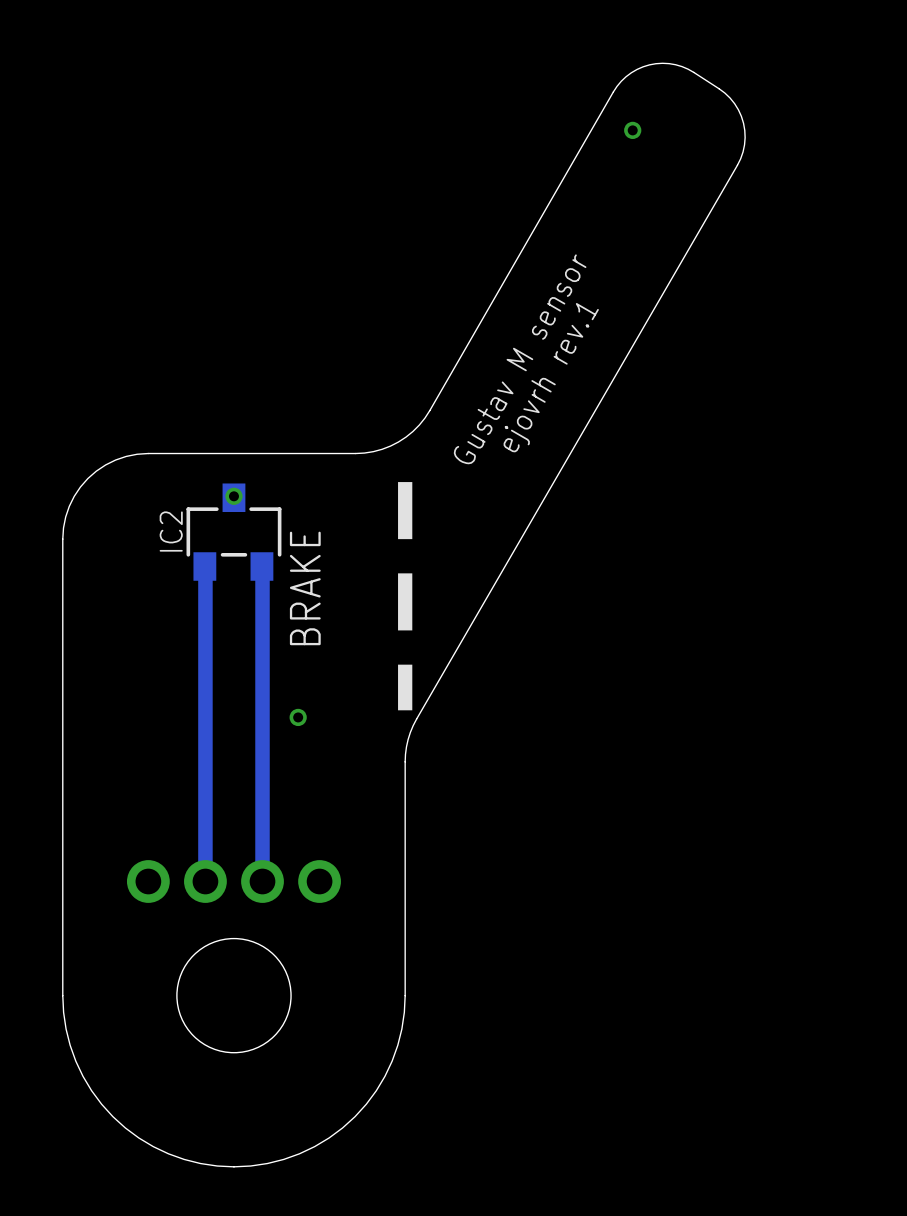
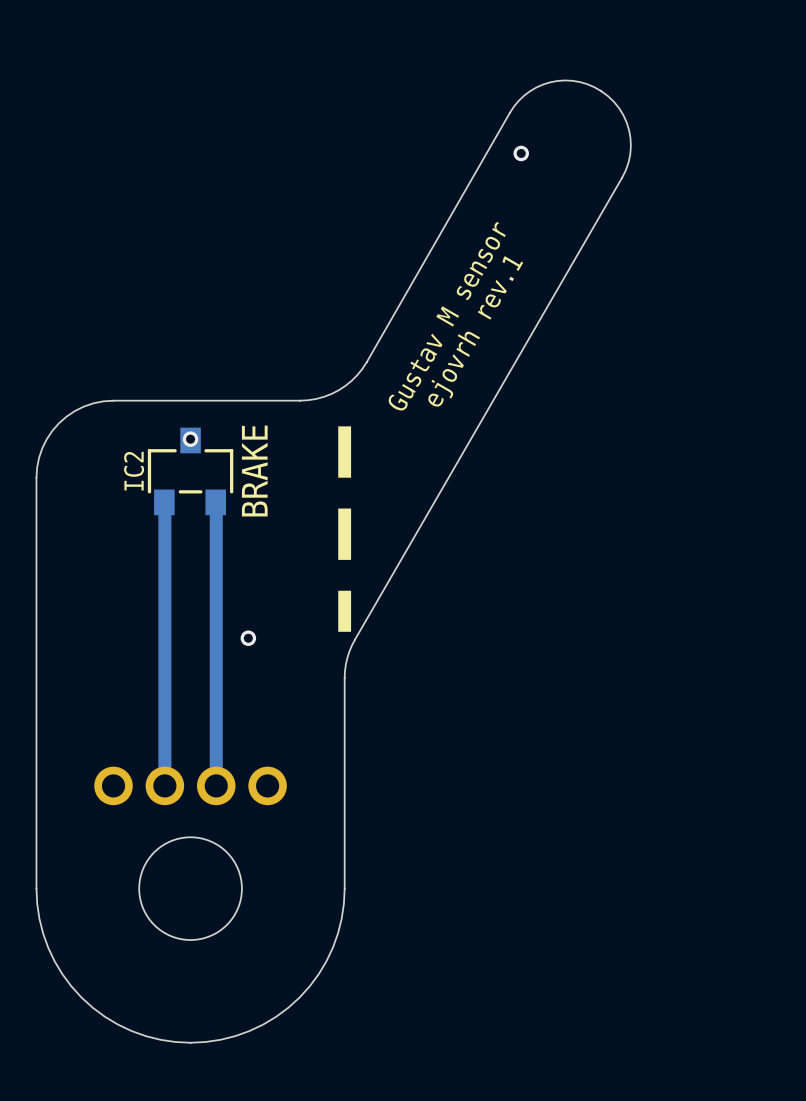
via position: (632, 130) -> (521, 153)
board edge: (429, 410) (621, 81) (631, 72) (643, 66) (655, 63) (669, 63) (688, 69) (724, 93) (738, 109) (743, 123) (745, 137) (740, 158) (416, 718) -> (366, 361) (509, 112) (518, 100) (530, 91) (543, 84) (565, 80) (587, 84) (608, 96) (619, 108) (629, 130) (630, 154) (625, 170) (355, 639)
text position: BRAKE (305, 588) -> BRAKE (254, 471)

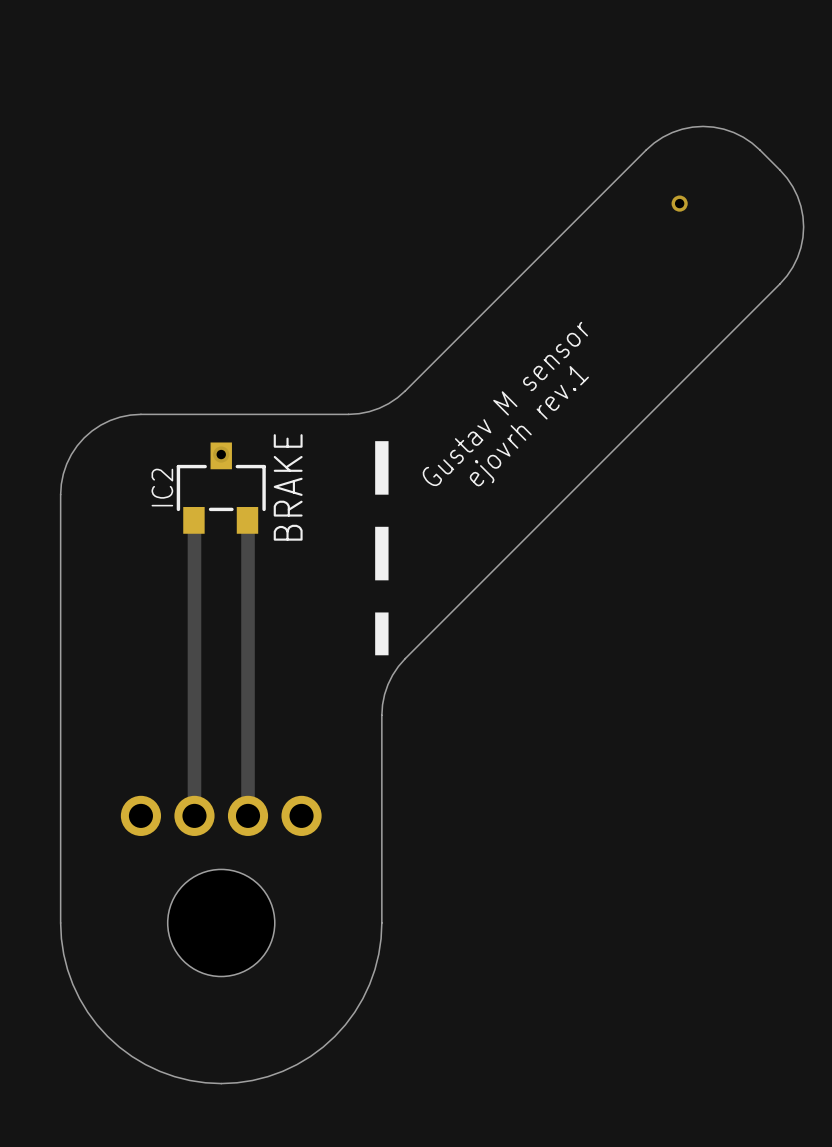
via position: (521, 153) -> (679, 203)
text rotation: 0° (446, 316) -> 15° clockwise (505, 403)
text rotation: 0° (475, 331) -> 15° clockwise (529, 426)
board edge: (300, 400) (323, 396) (338, 390) (351, 380) (362, 368) (509, 112) (518, 100) (530, 91) (543, 84) (565, 80) (580, 82) (594, 87) (613, 101) (623, 115) (629, 130) (630, 154) (625, 170) (355, 639) (345, 664) (344, 689) -> (335, 414) (369, 411) (397, 397) (646, 149) (672, 132) (703, 126) (723, 129) (743, 137) (759, 149) (780, 170) (797, 196) (802, 216) (802, 237) (797, 257) (787, 275) (405, 658) (387, 684) (381, 715)
via: (248, 638) -> none

